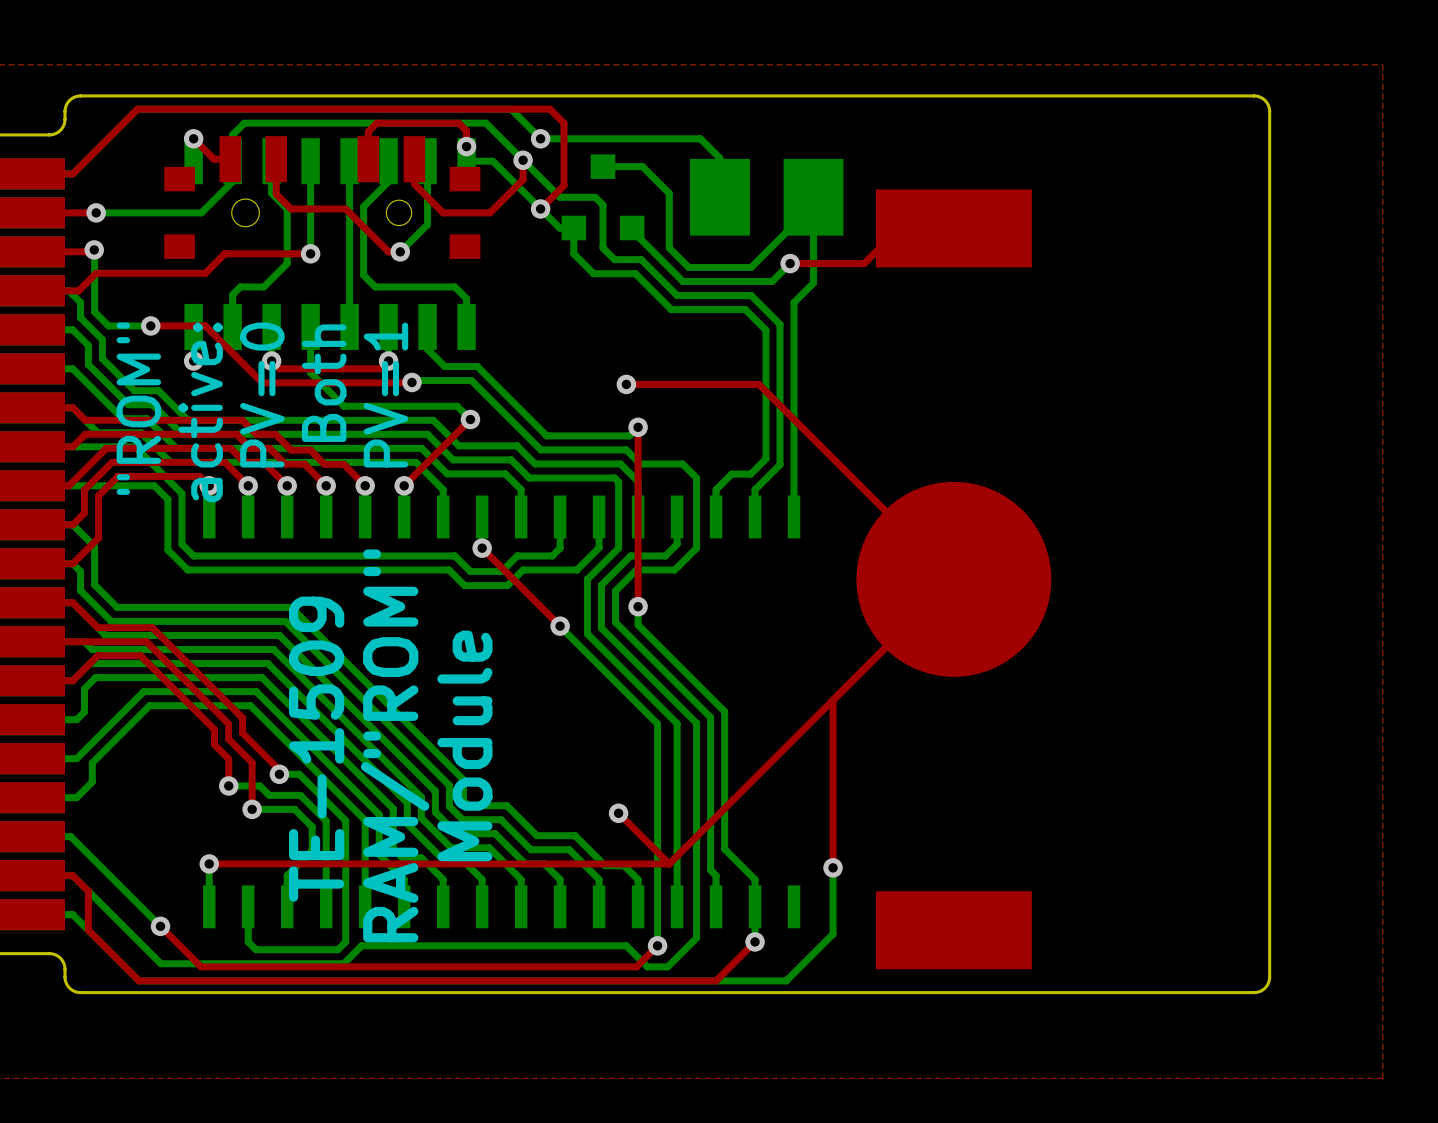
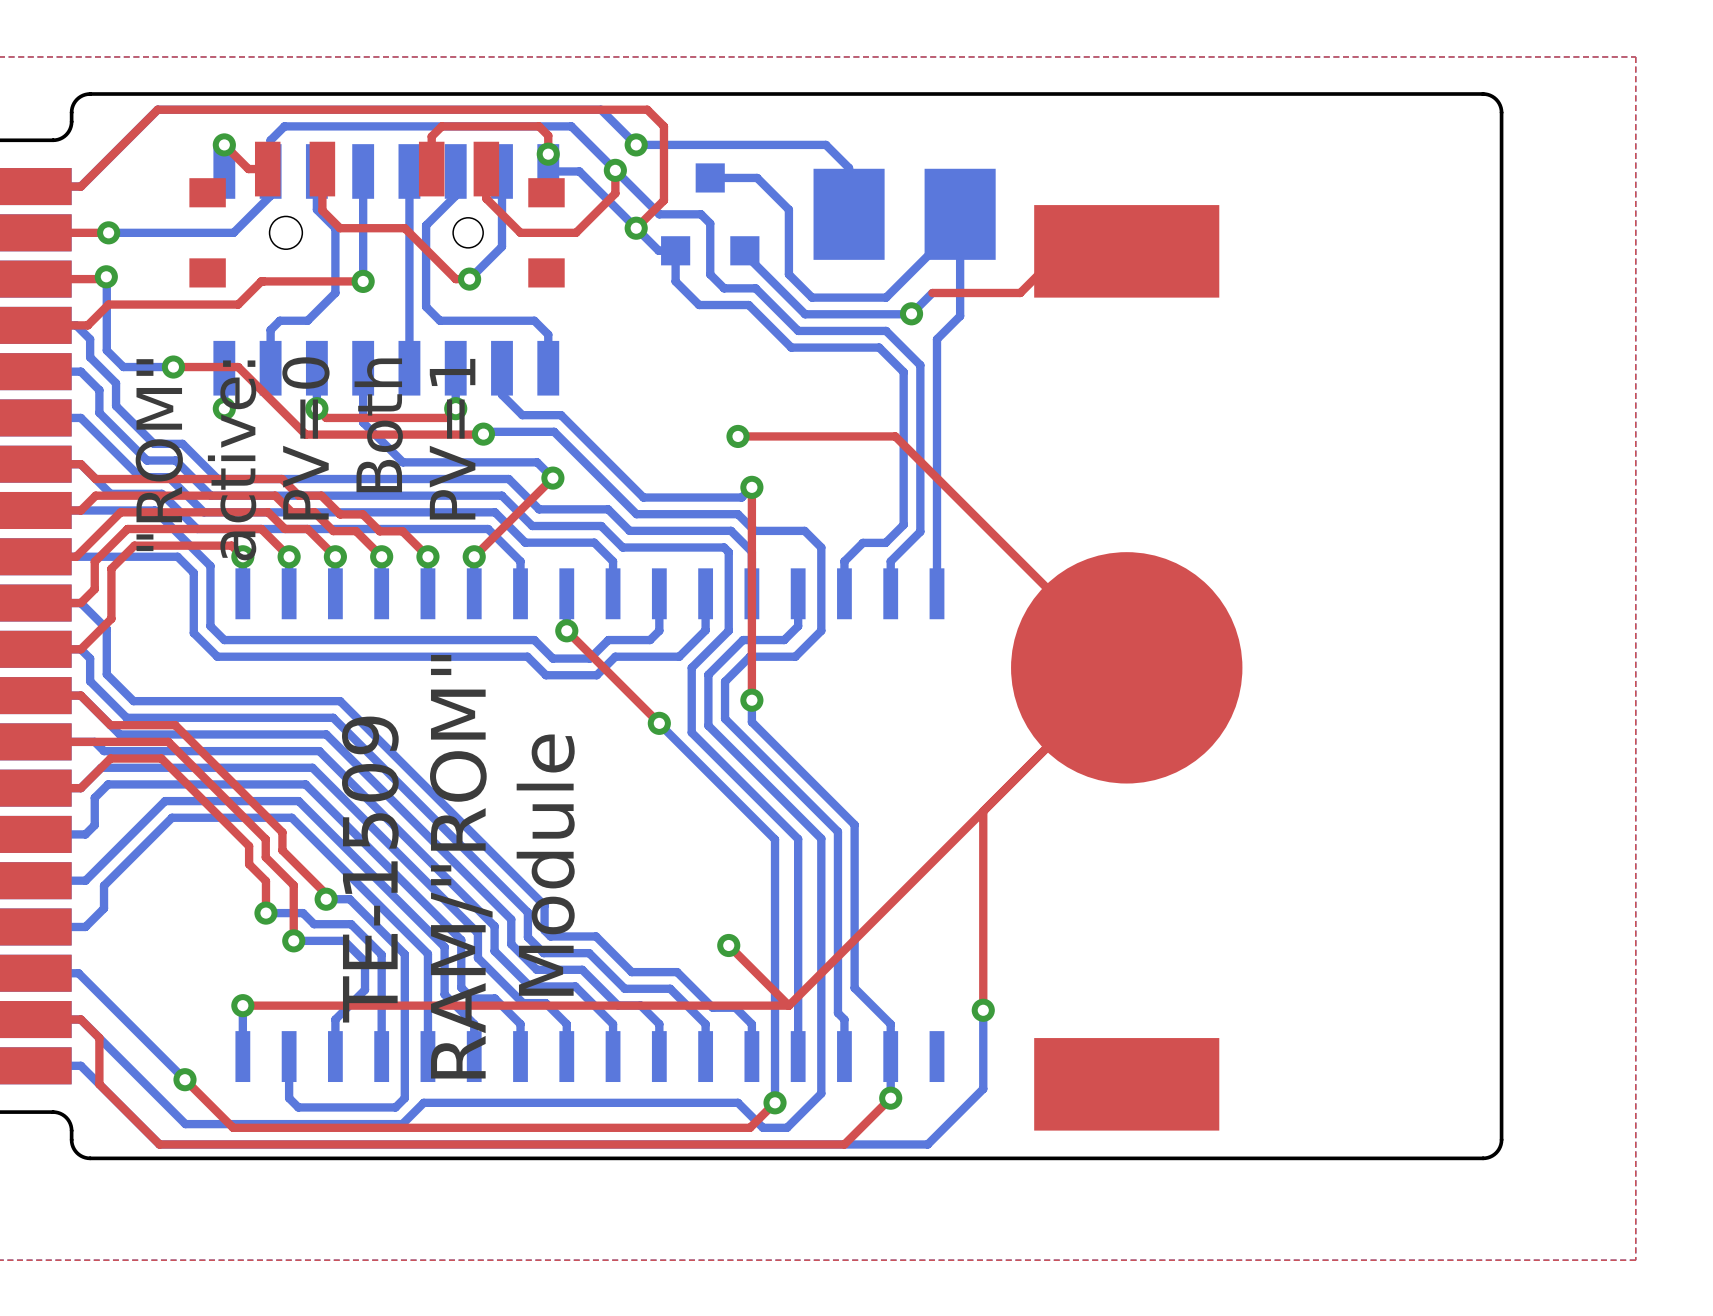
via position: (790, 263) -> (911, 313)

